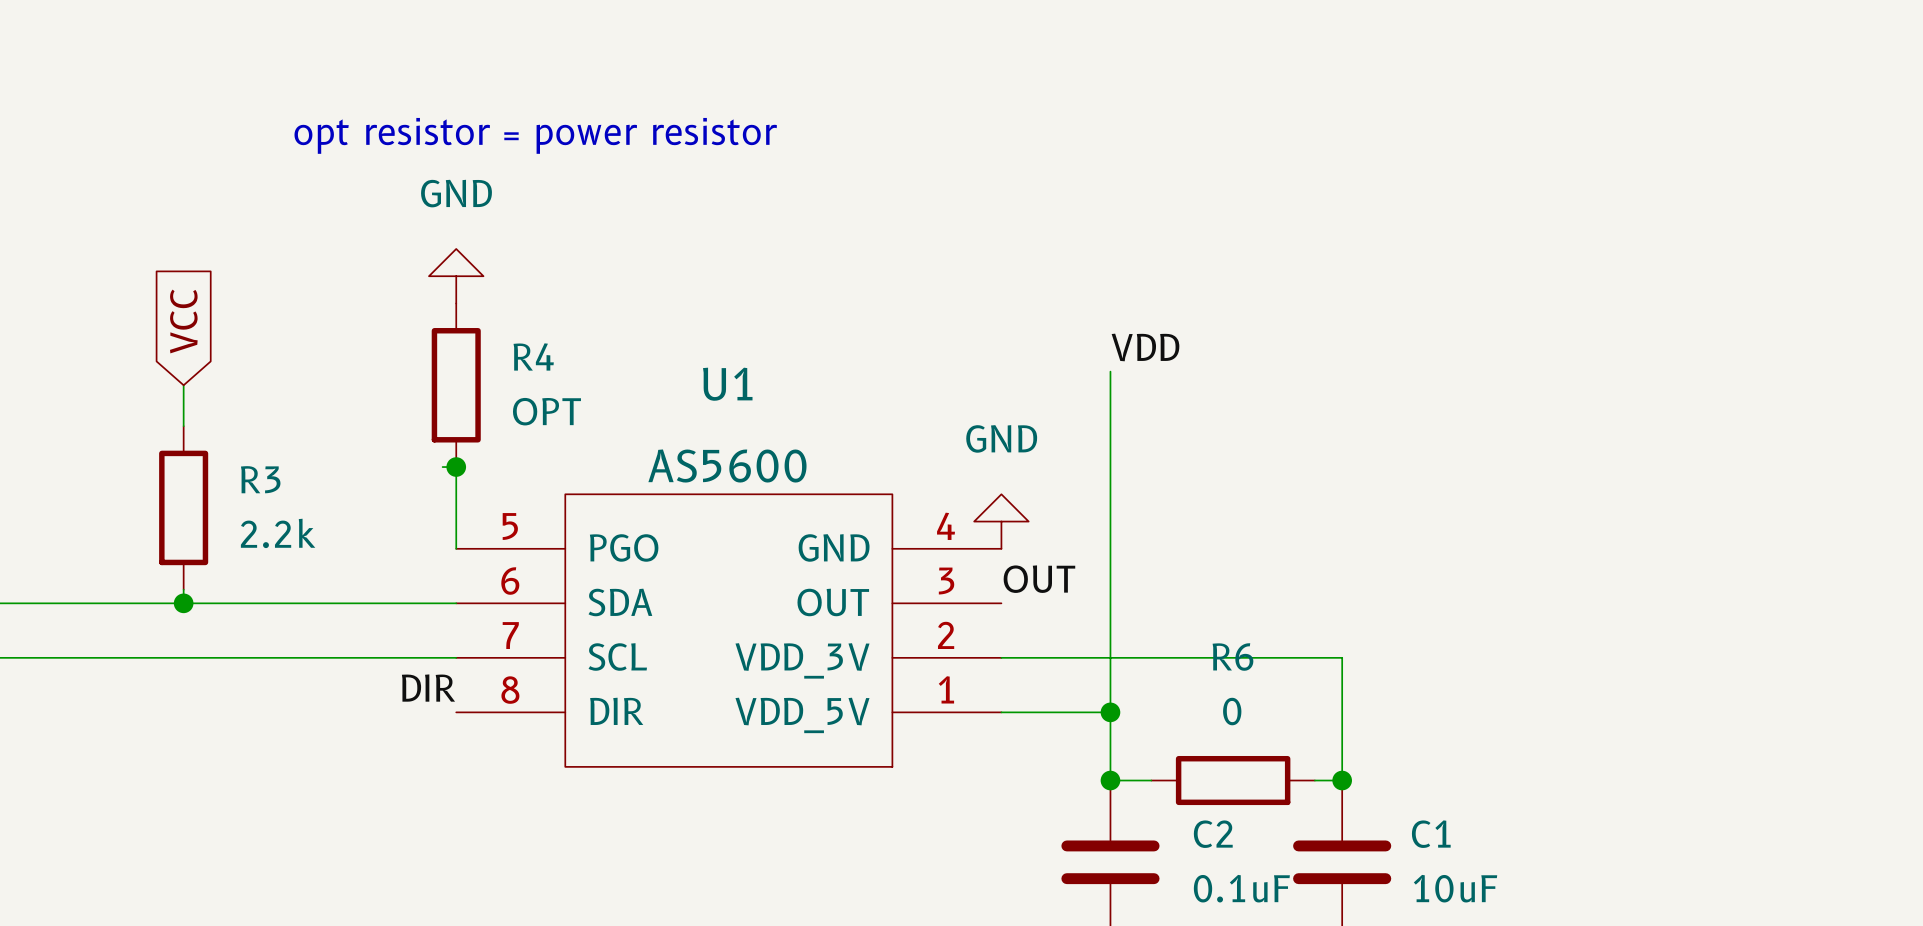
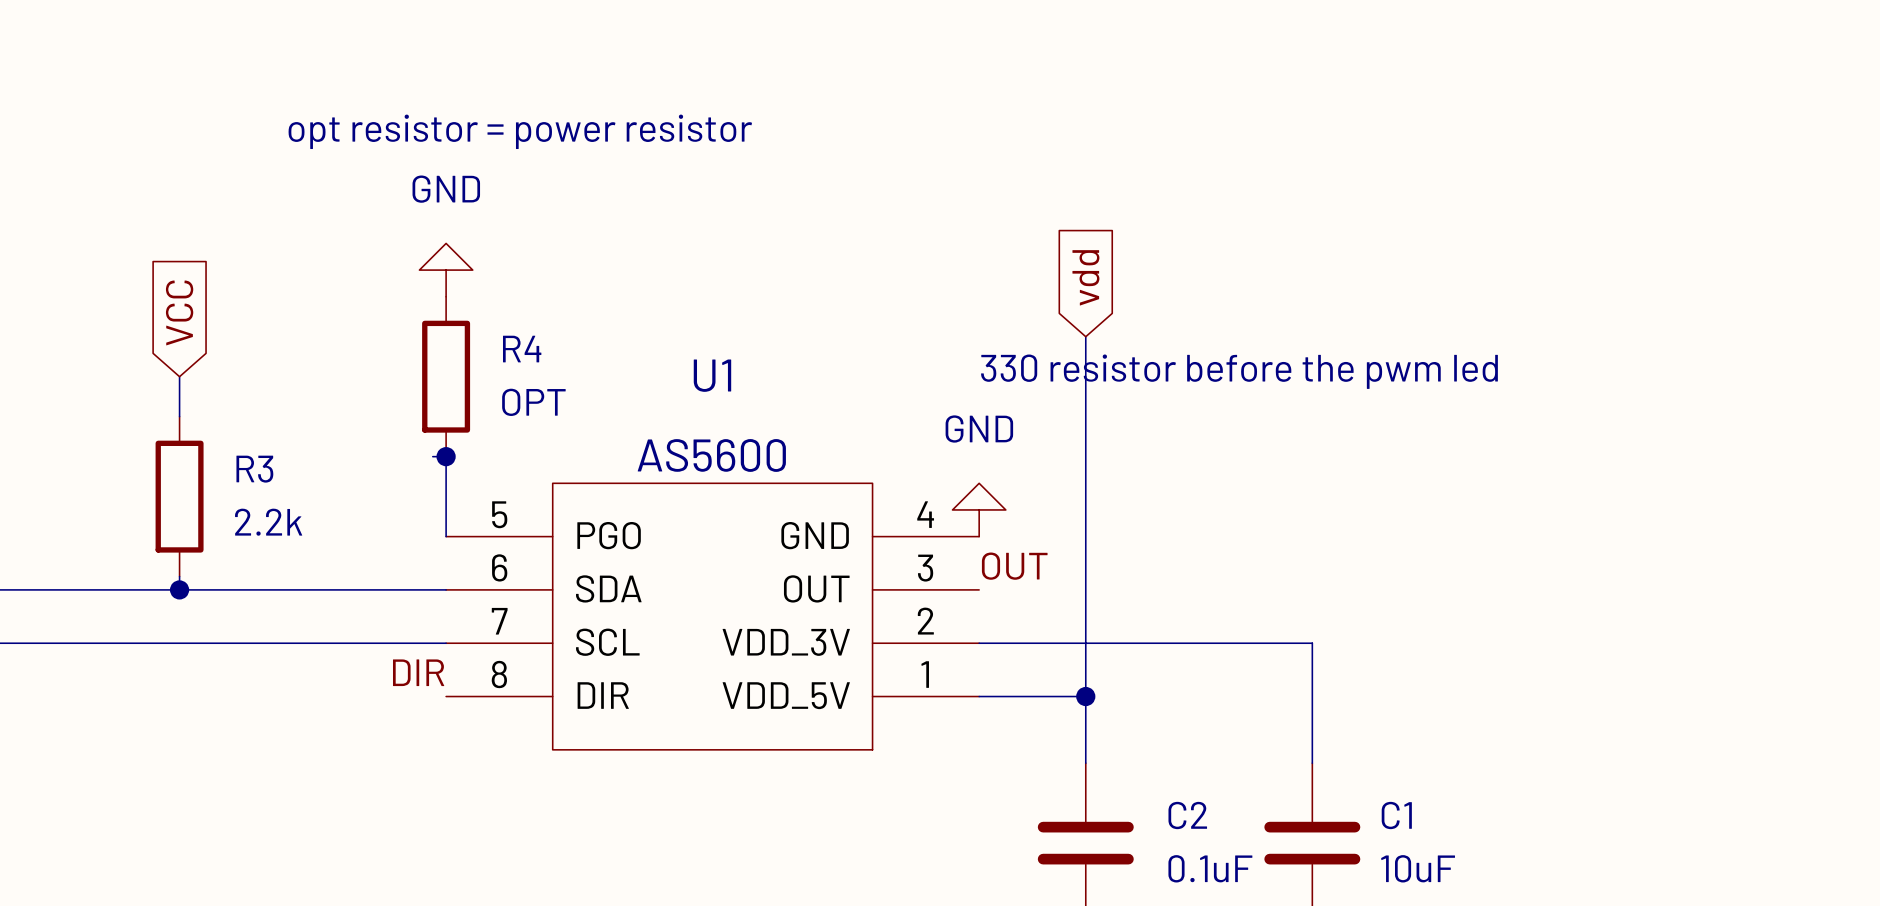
global label: none -> vdd (1085, 277)
wire: none -> (1085, 336) (1085, 363)
label: VDD (1145, 347) -> none
text: none -> 330 resistor before the pwm led (1239, 371)
wire: (1110, 780) (1151, 780) -> none
junction: (1110, 780) -> none
R6: 0 (1233, 780) -> none
wire: (1314, 780) (1342, 780) -> none
junction: (1342, 780) -> none

